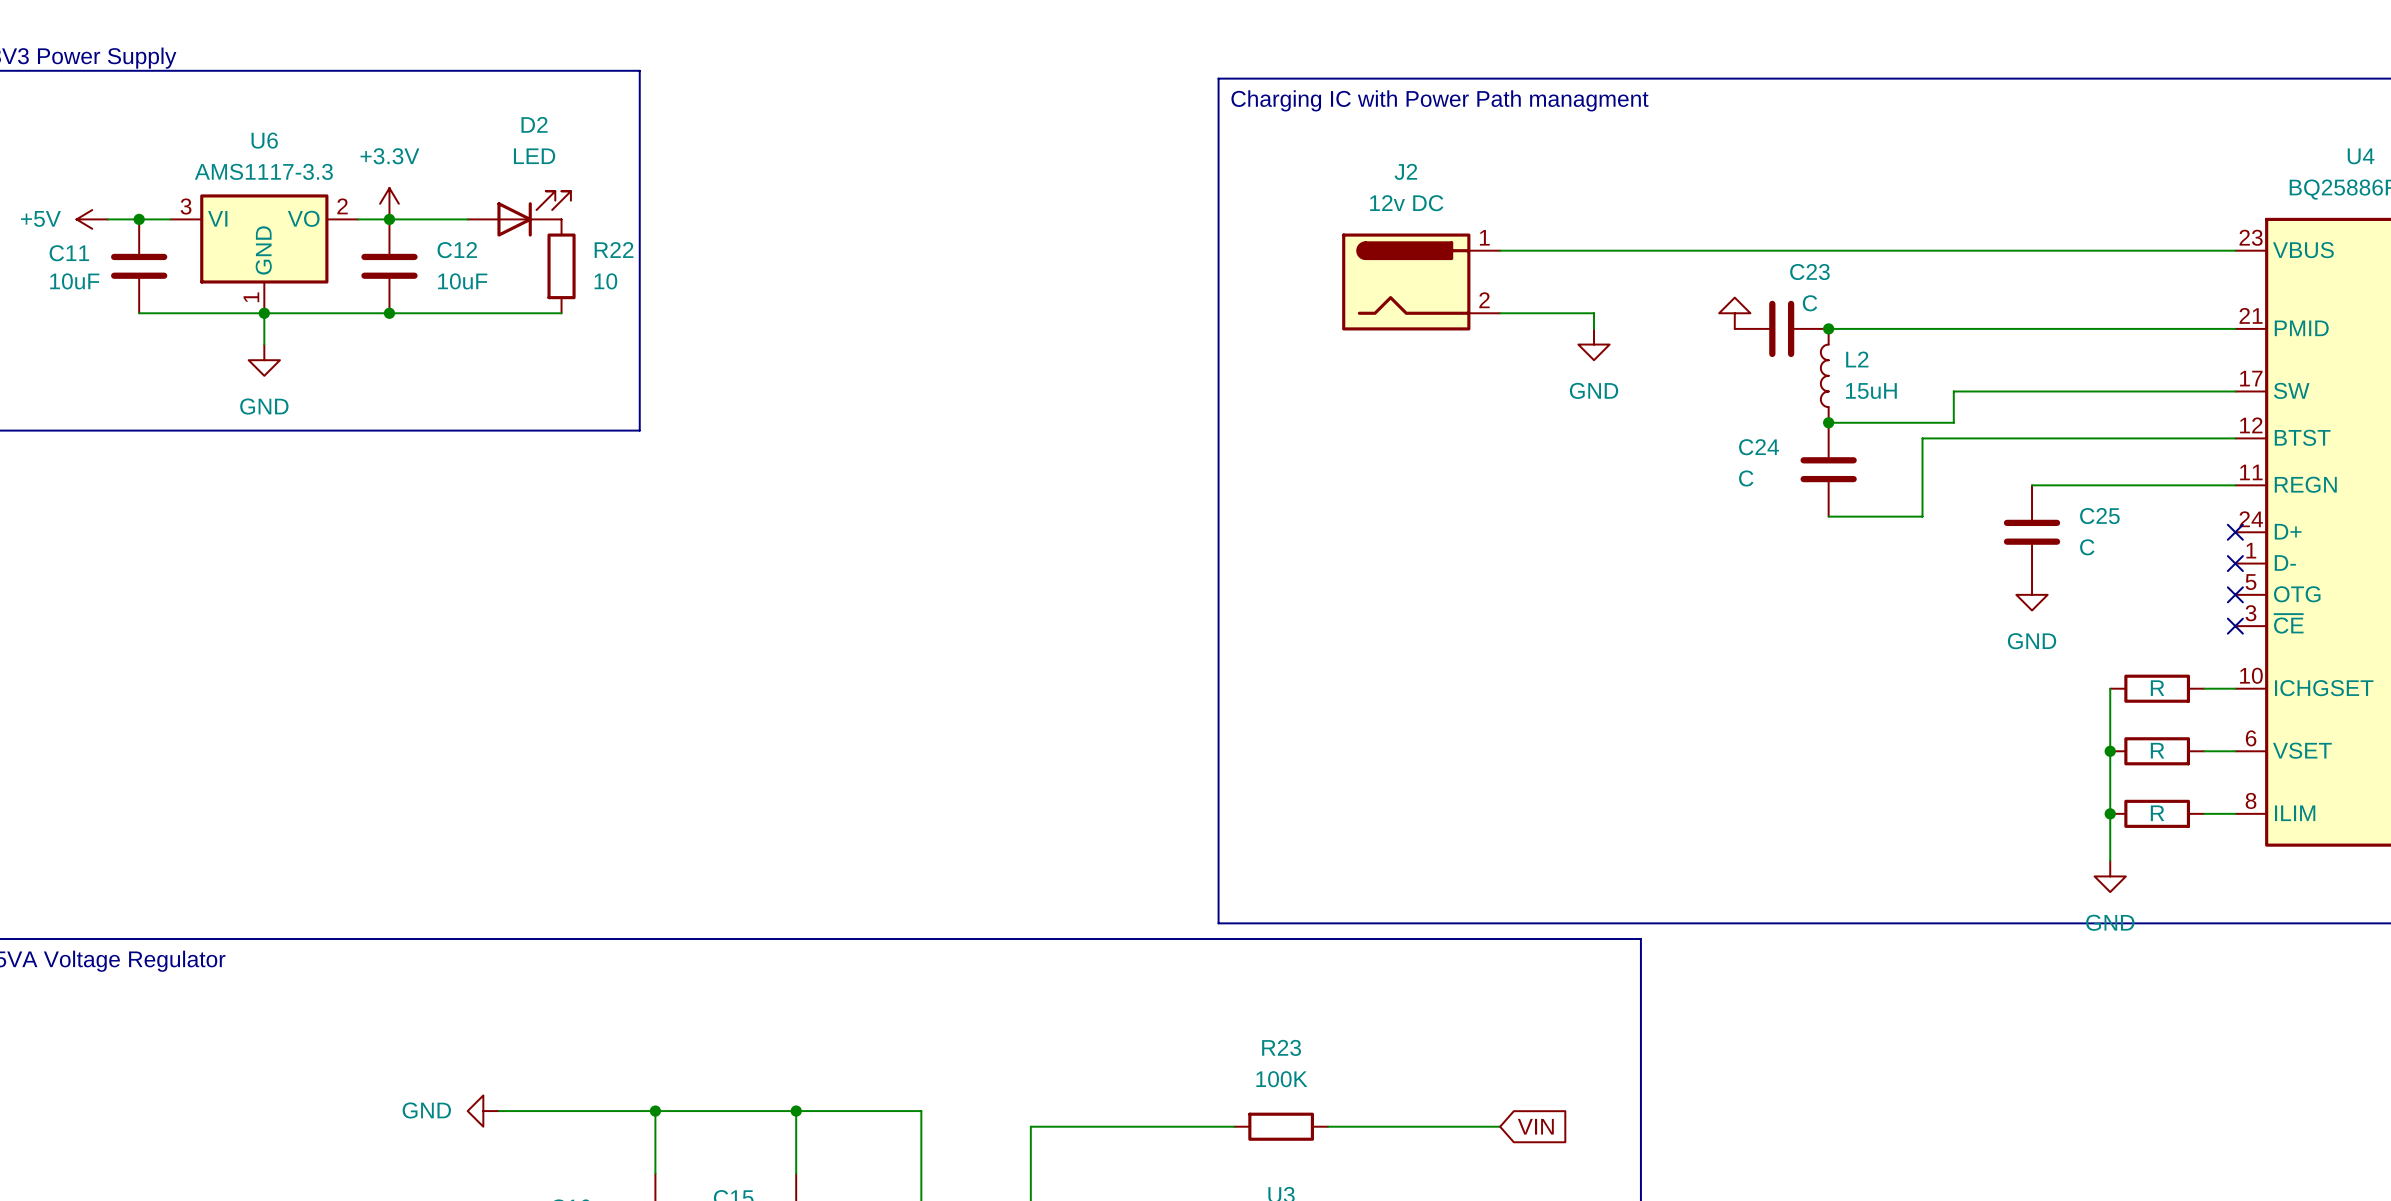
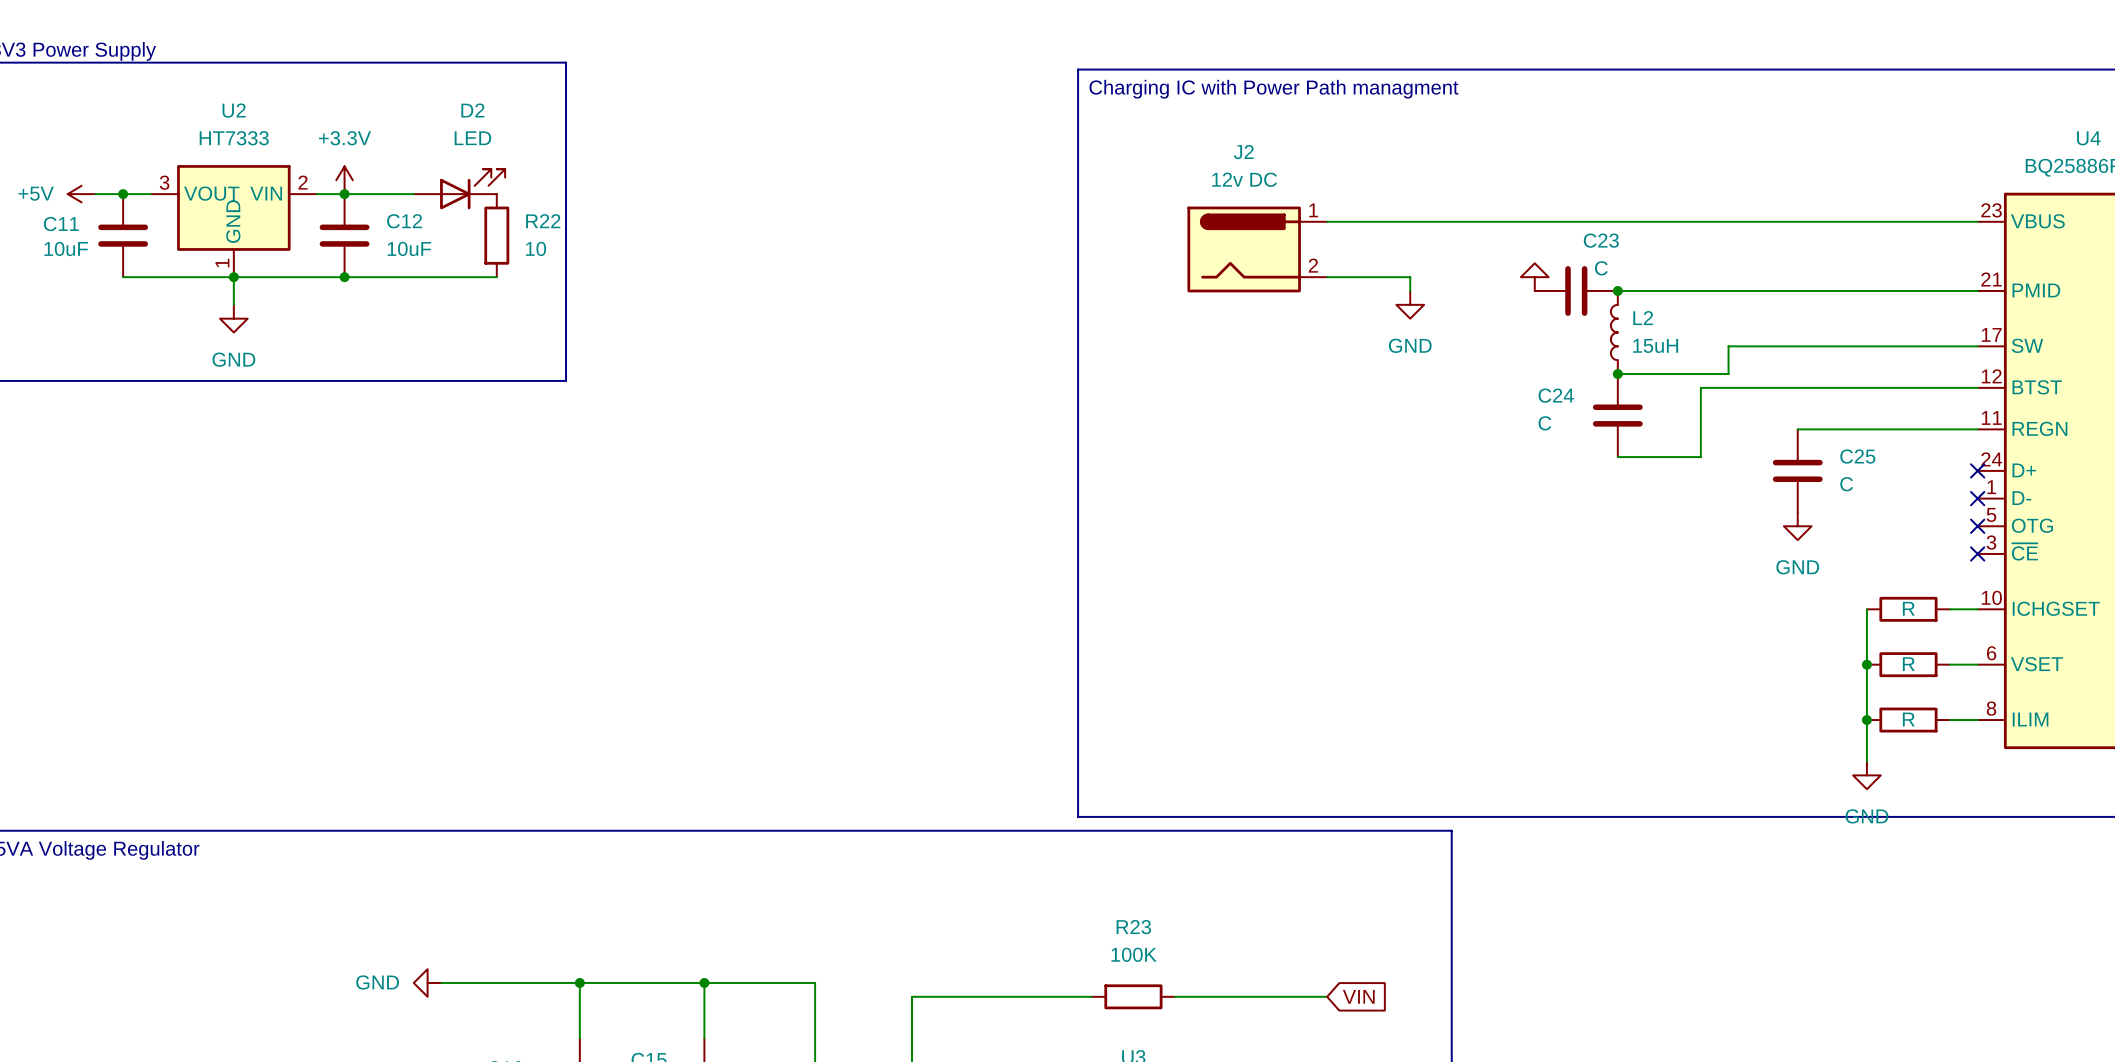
U2: none -> HT7333 (233, 221)
U6: AMS1117-3.3 (264, 253) -> none

